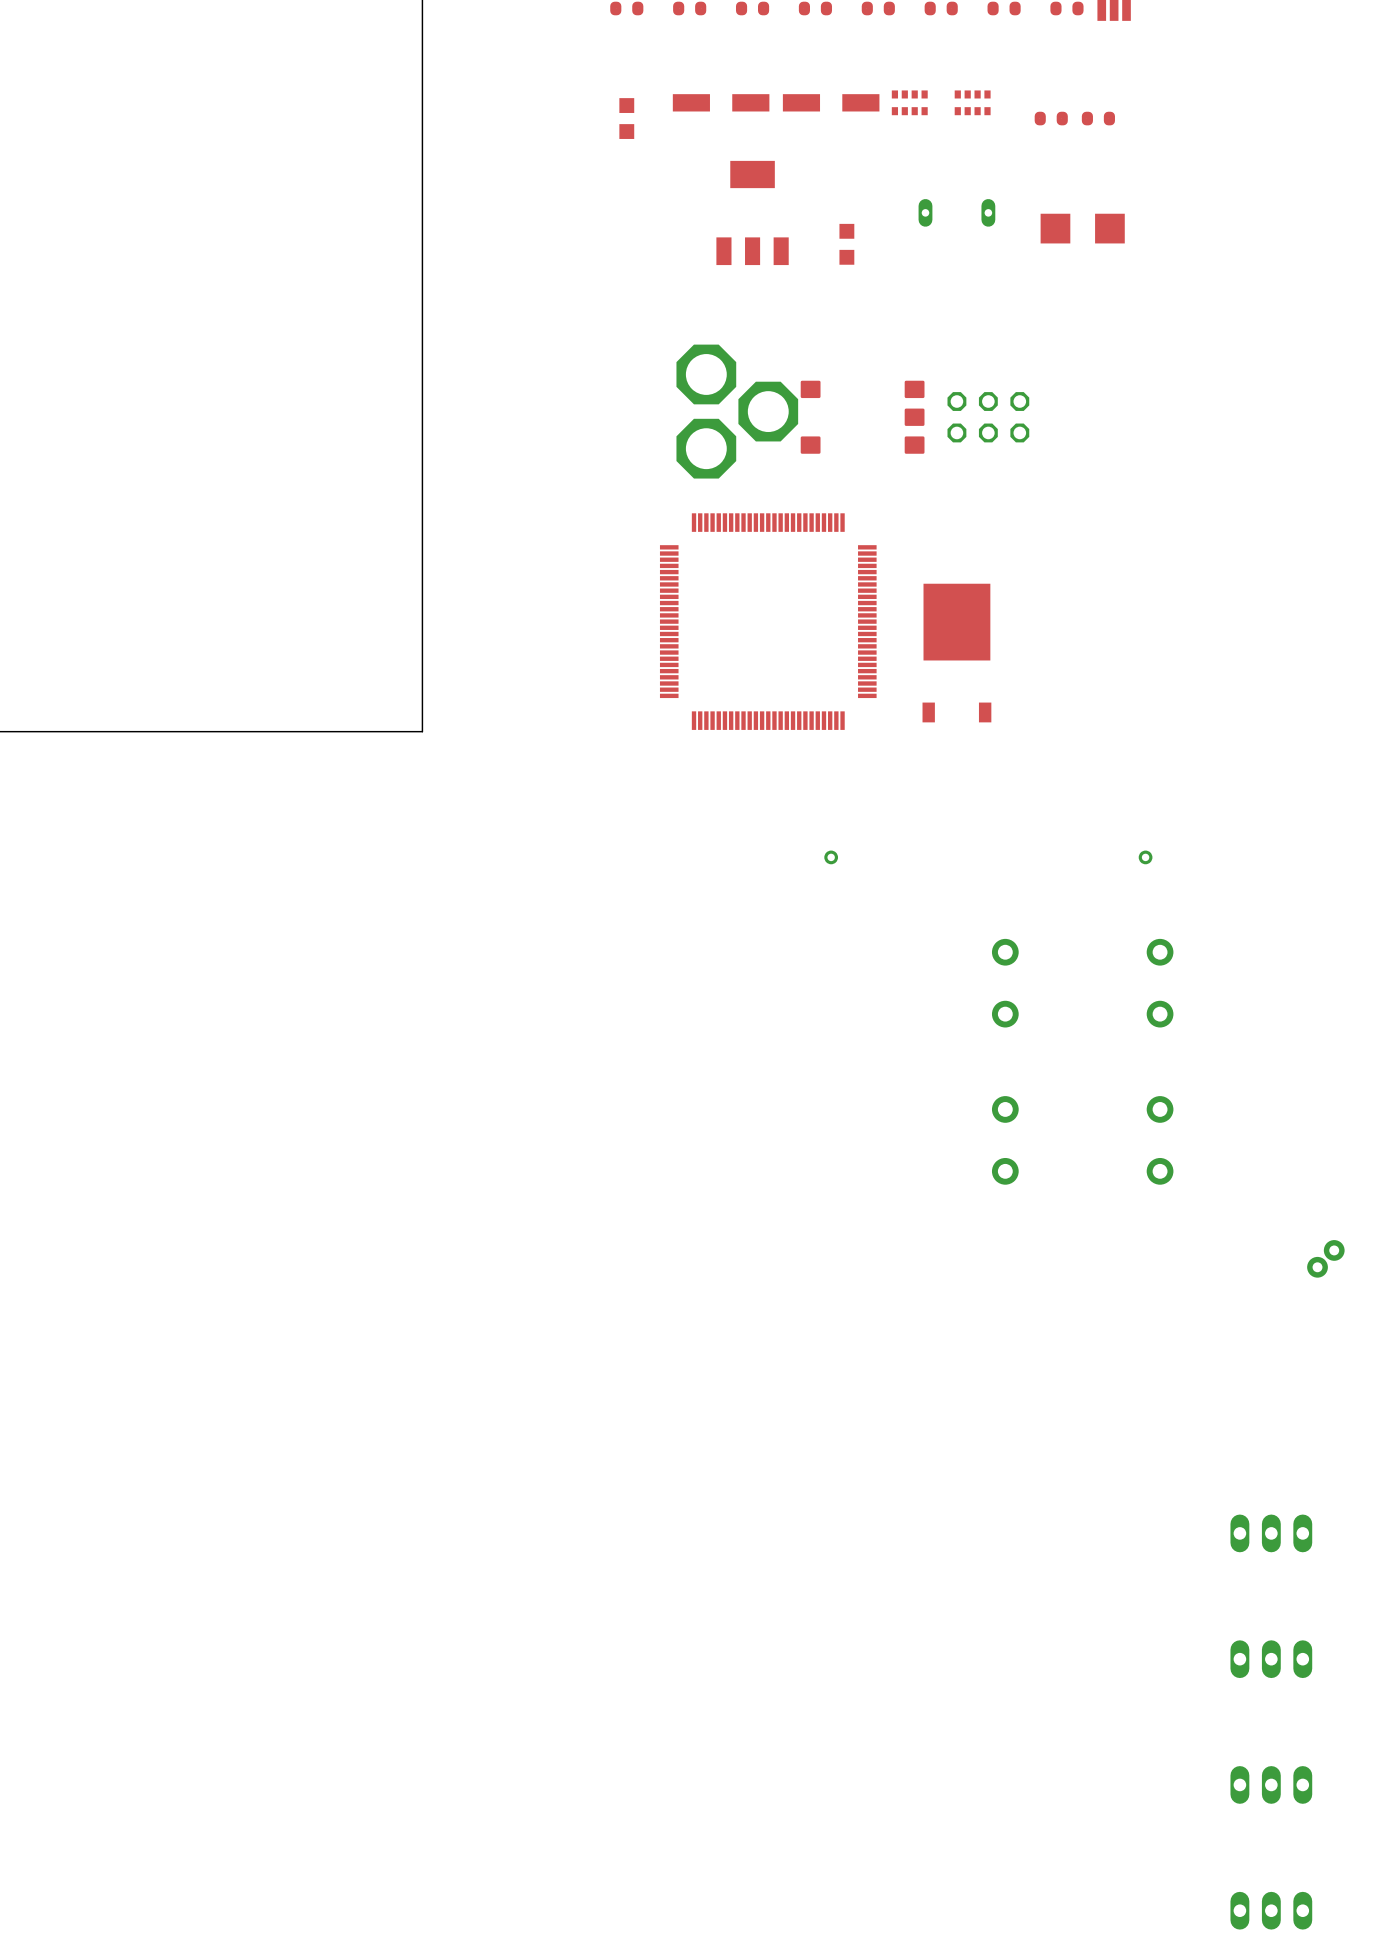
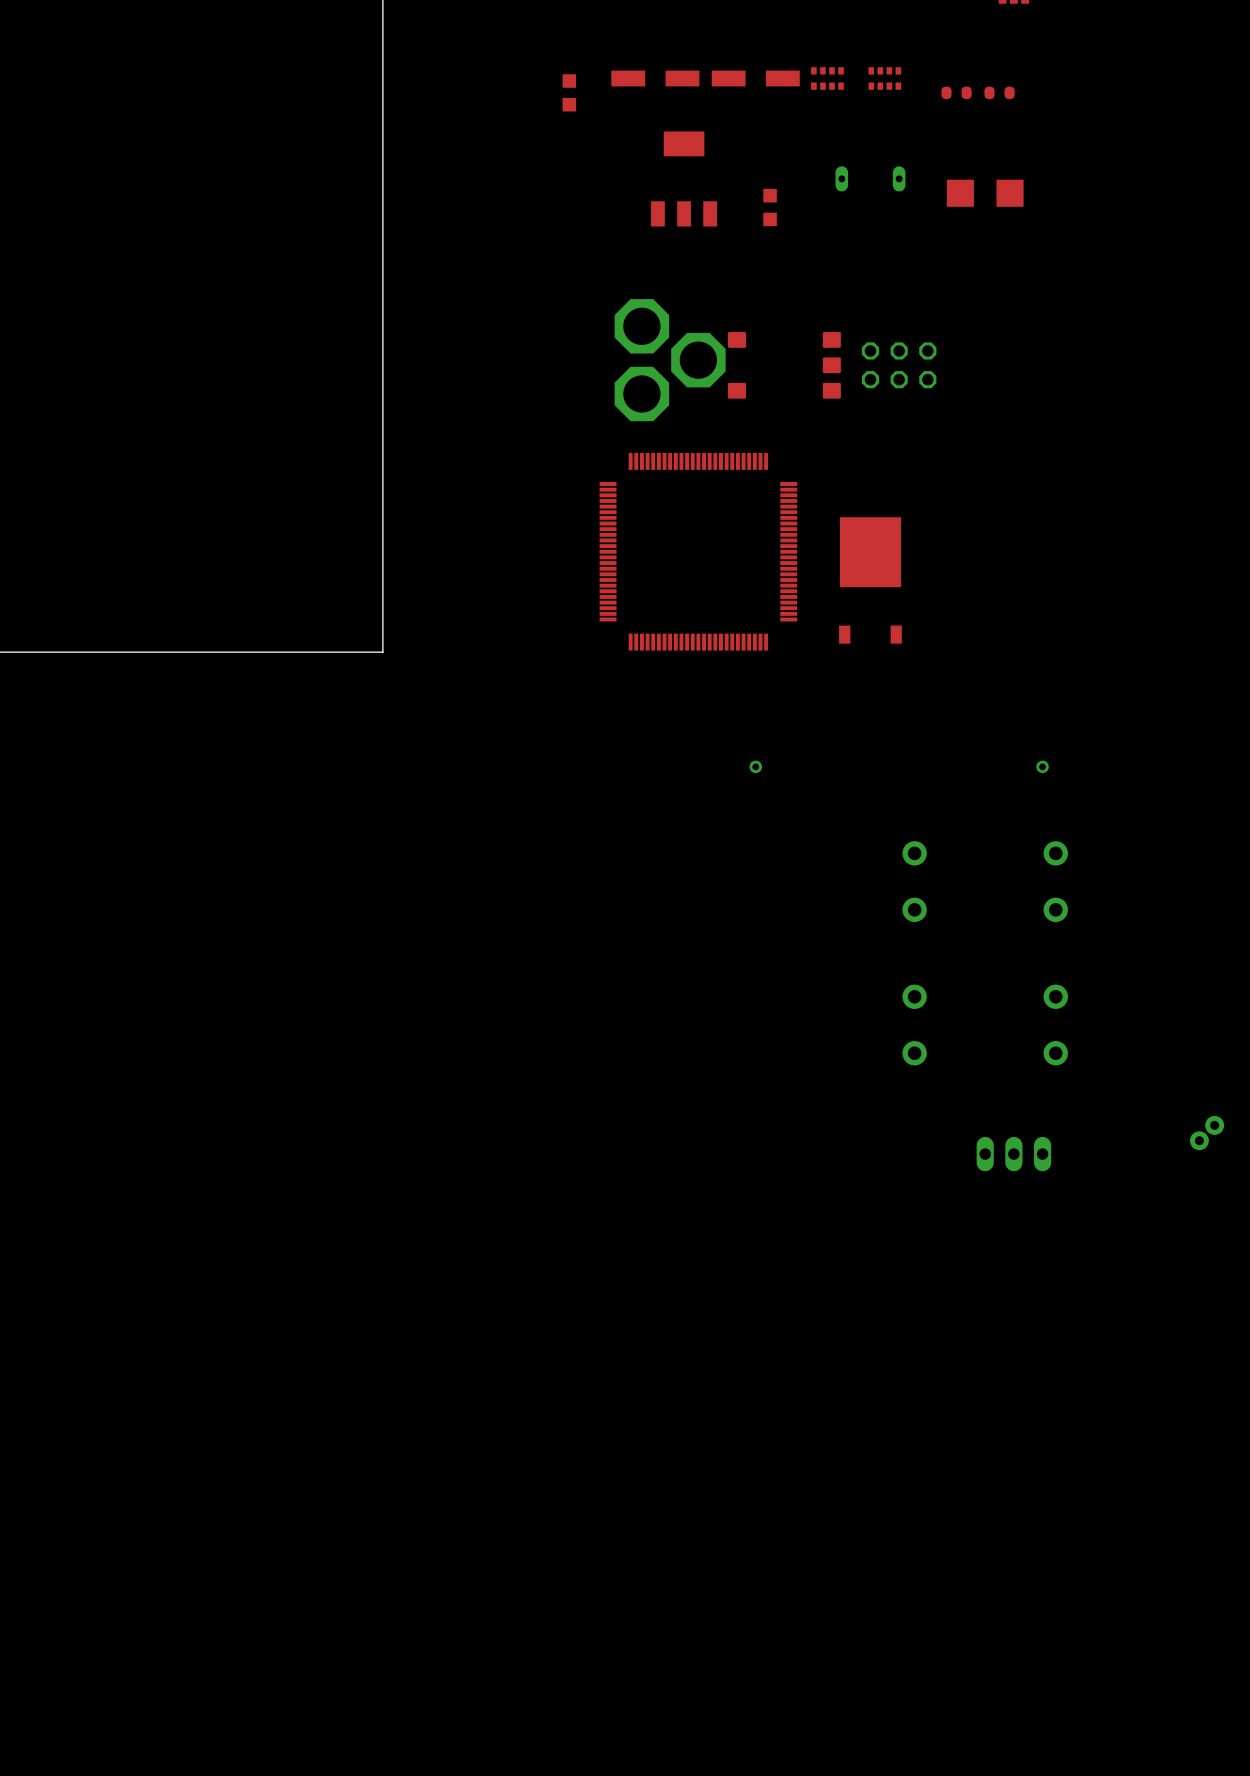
part: none -> (1013, 1154)
part: (1271, 1533) -> none
part: (1271, 1659) -> none
part: (1271, 1784) -> none
part: (1271, 1910) -> none

